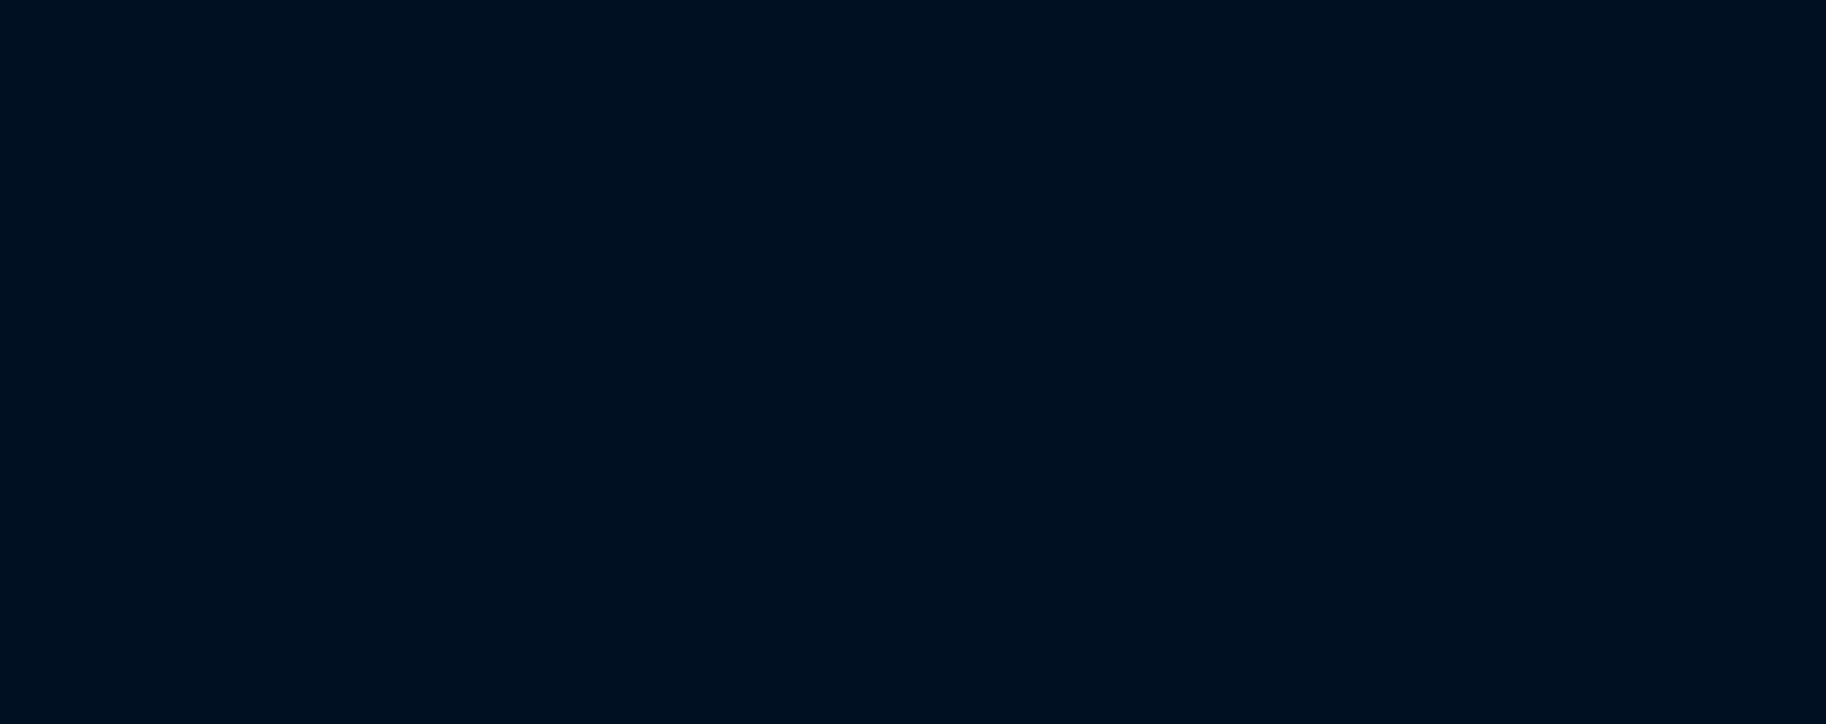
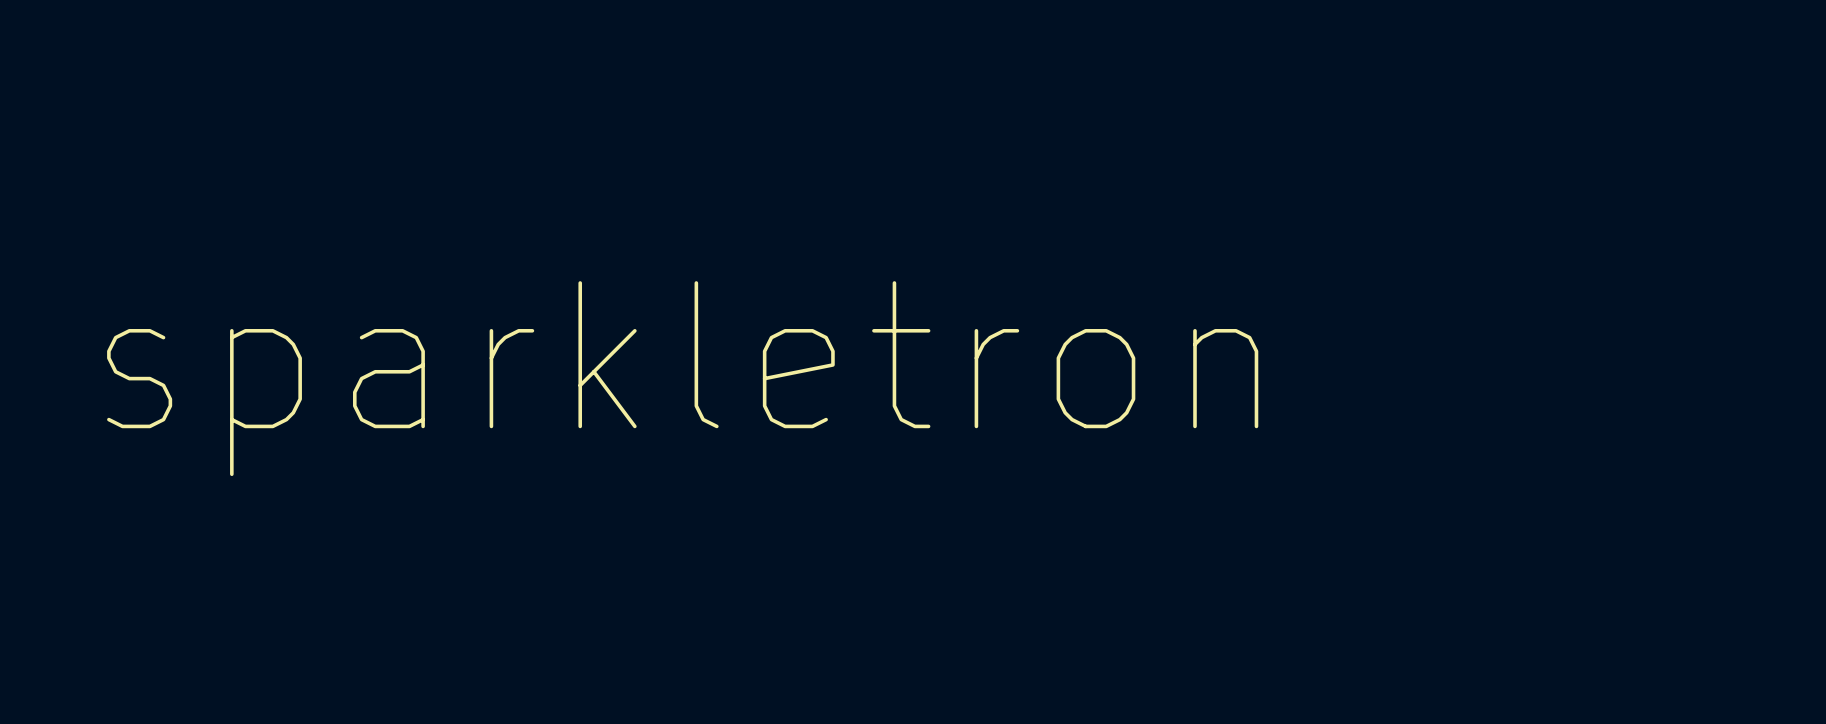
drawing: none -> [107, 281, 1259, 477]

